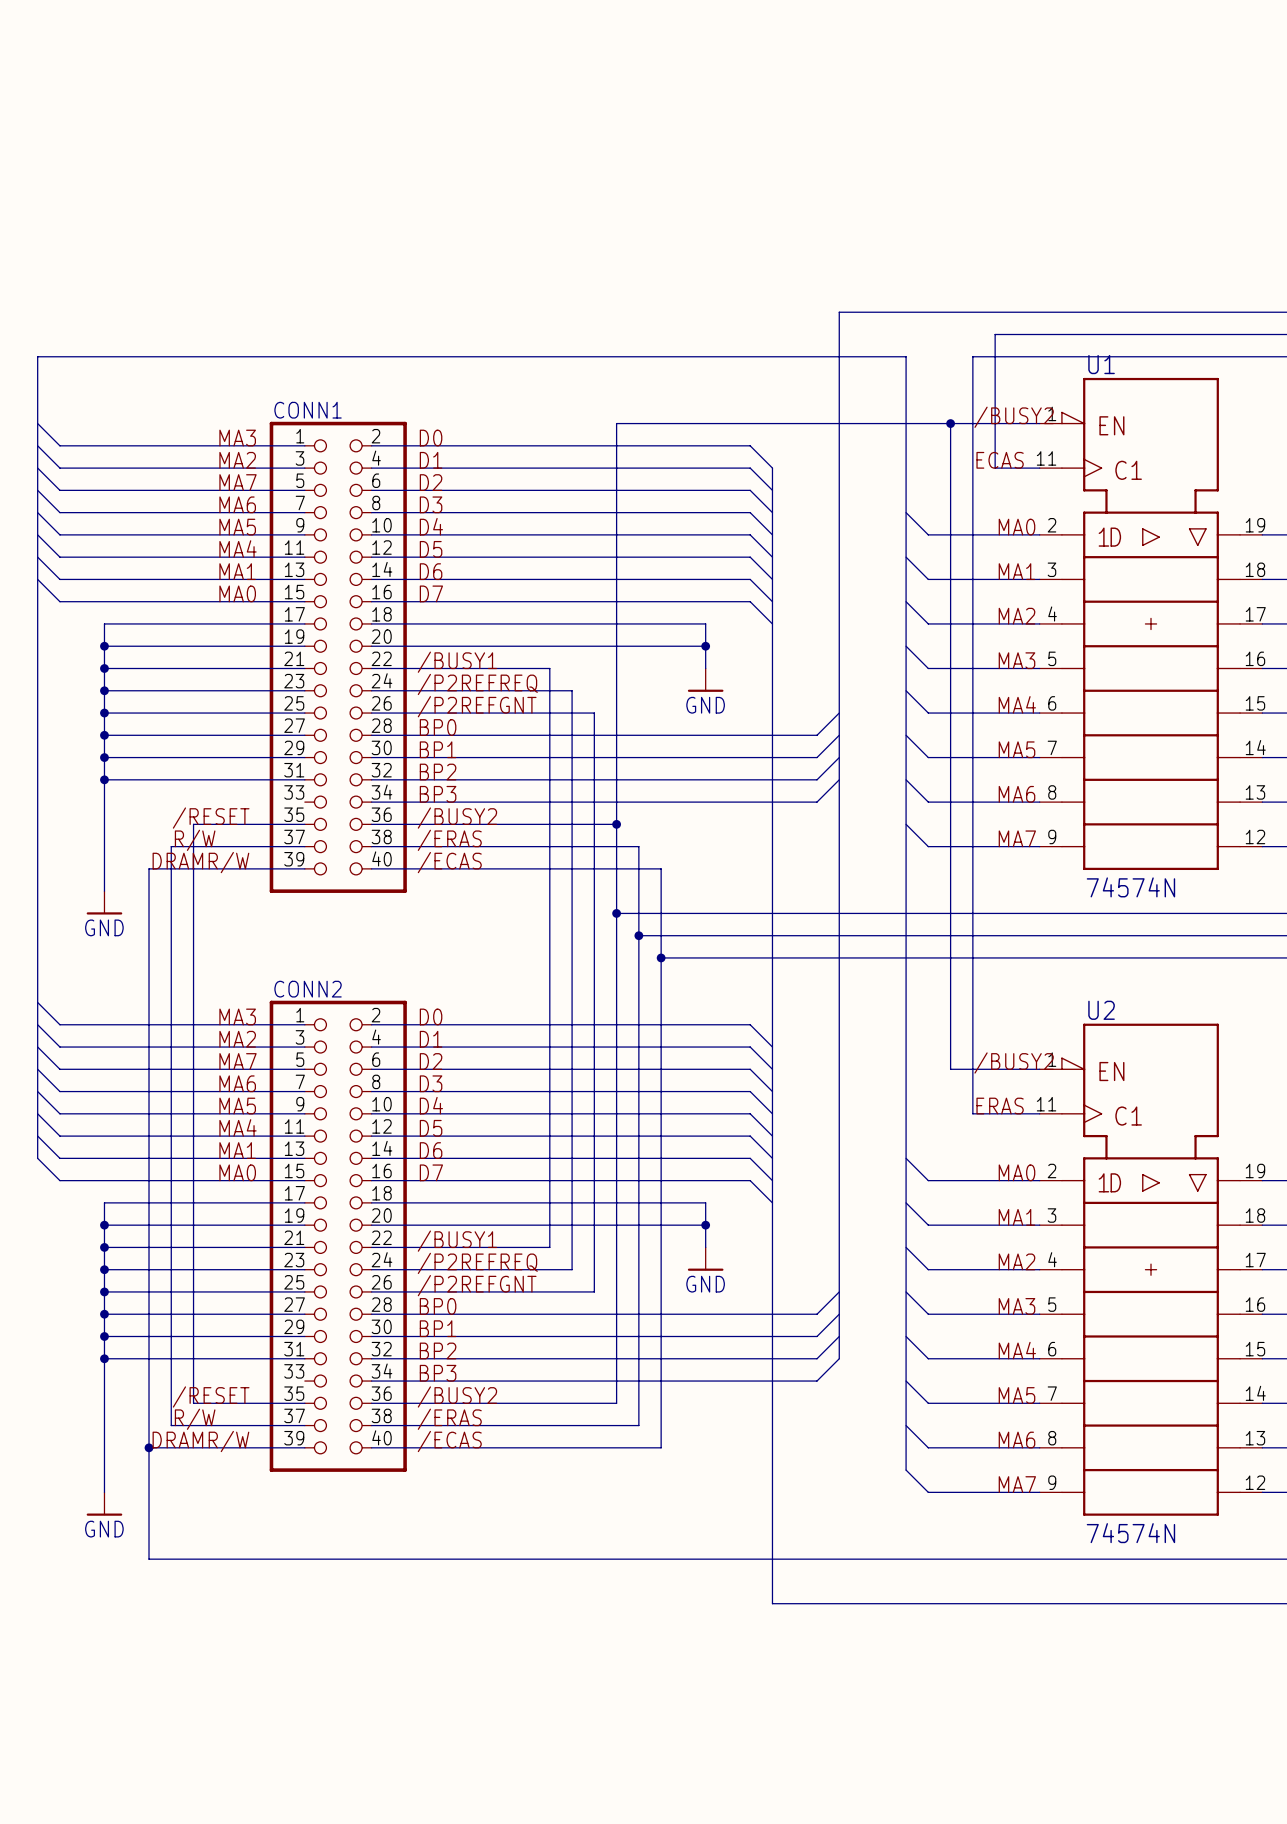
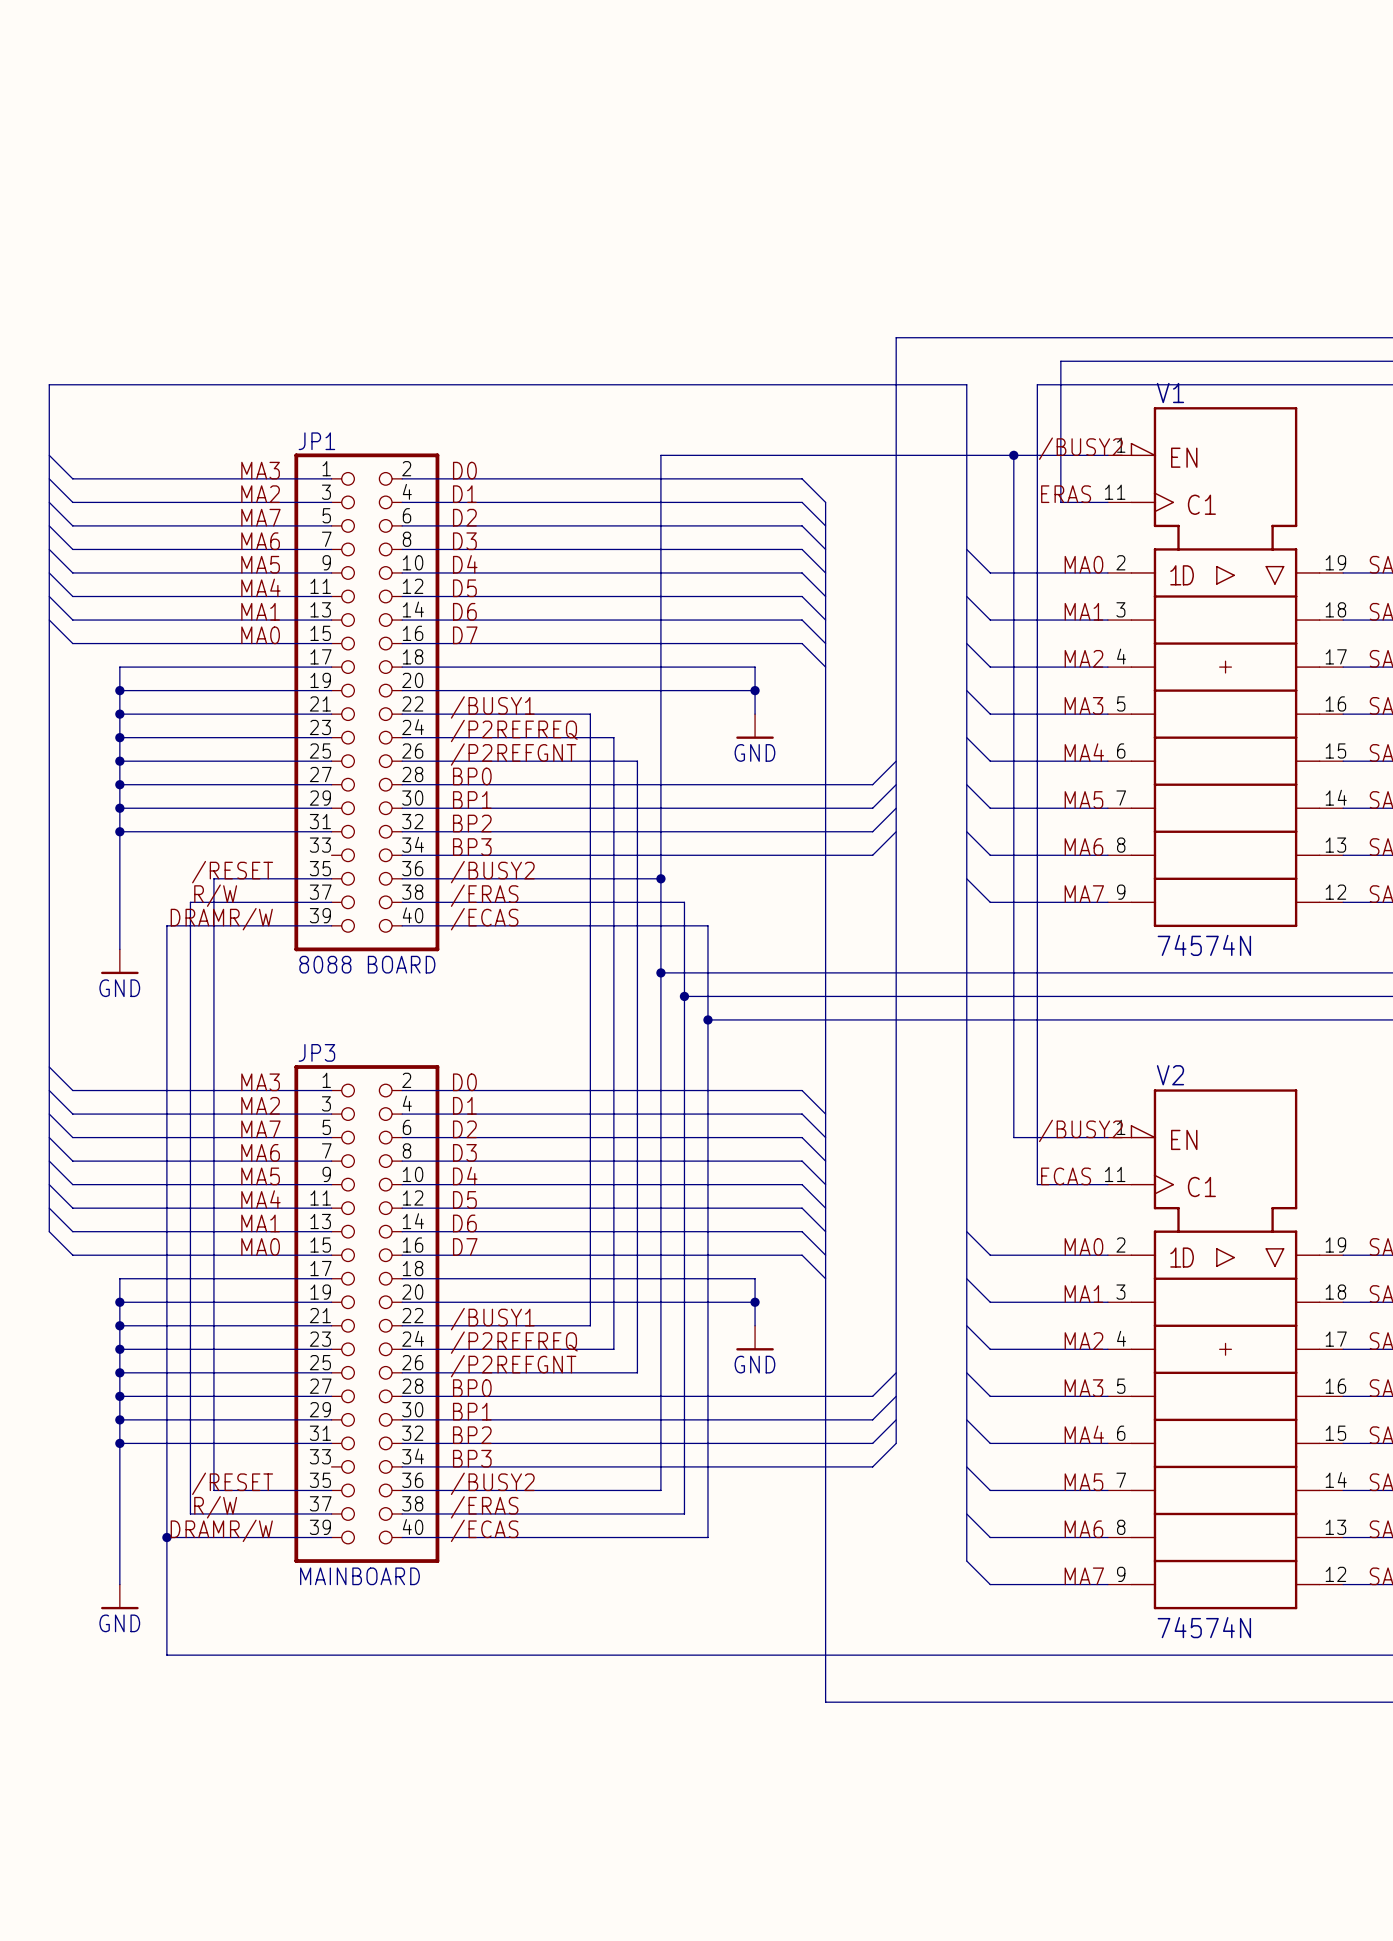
U1 name: U1 (1101, 364) -> V1 (1170, 393)
CONN1 name: CONN1 (308, 410) -> JP1 (316, 441)
label: ECAS (1000, 460) -> ERAS (1066, 494)
CONN1 value: none -> 8088 BOARD (367, 964)
CONN2 name: CONN2 (308, 989) -> JP3 (316, 1052)
U2 name: U2 (1101, 1010) -> V2 (1170, 1075)
label: ERAS (1000, 1106) -> ECAS (1066, 1176)
CONN2 value: none -> MAINBOARD (359, 1576)

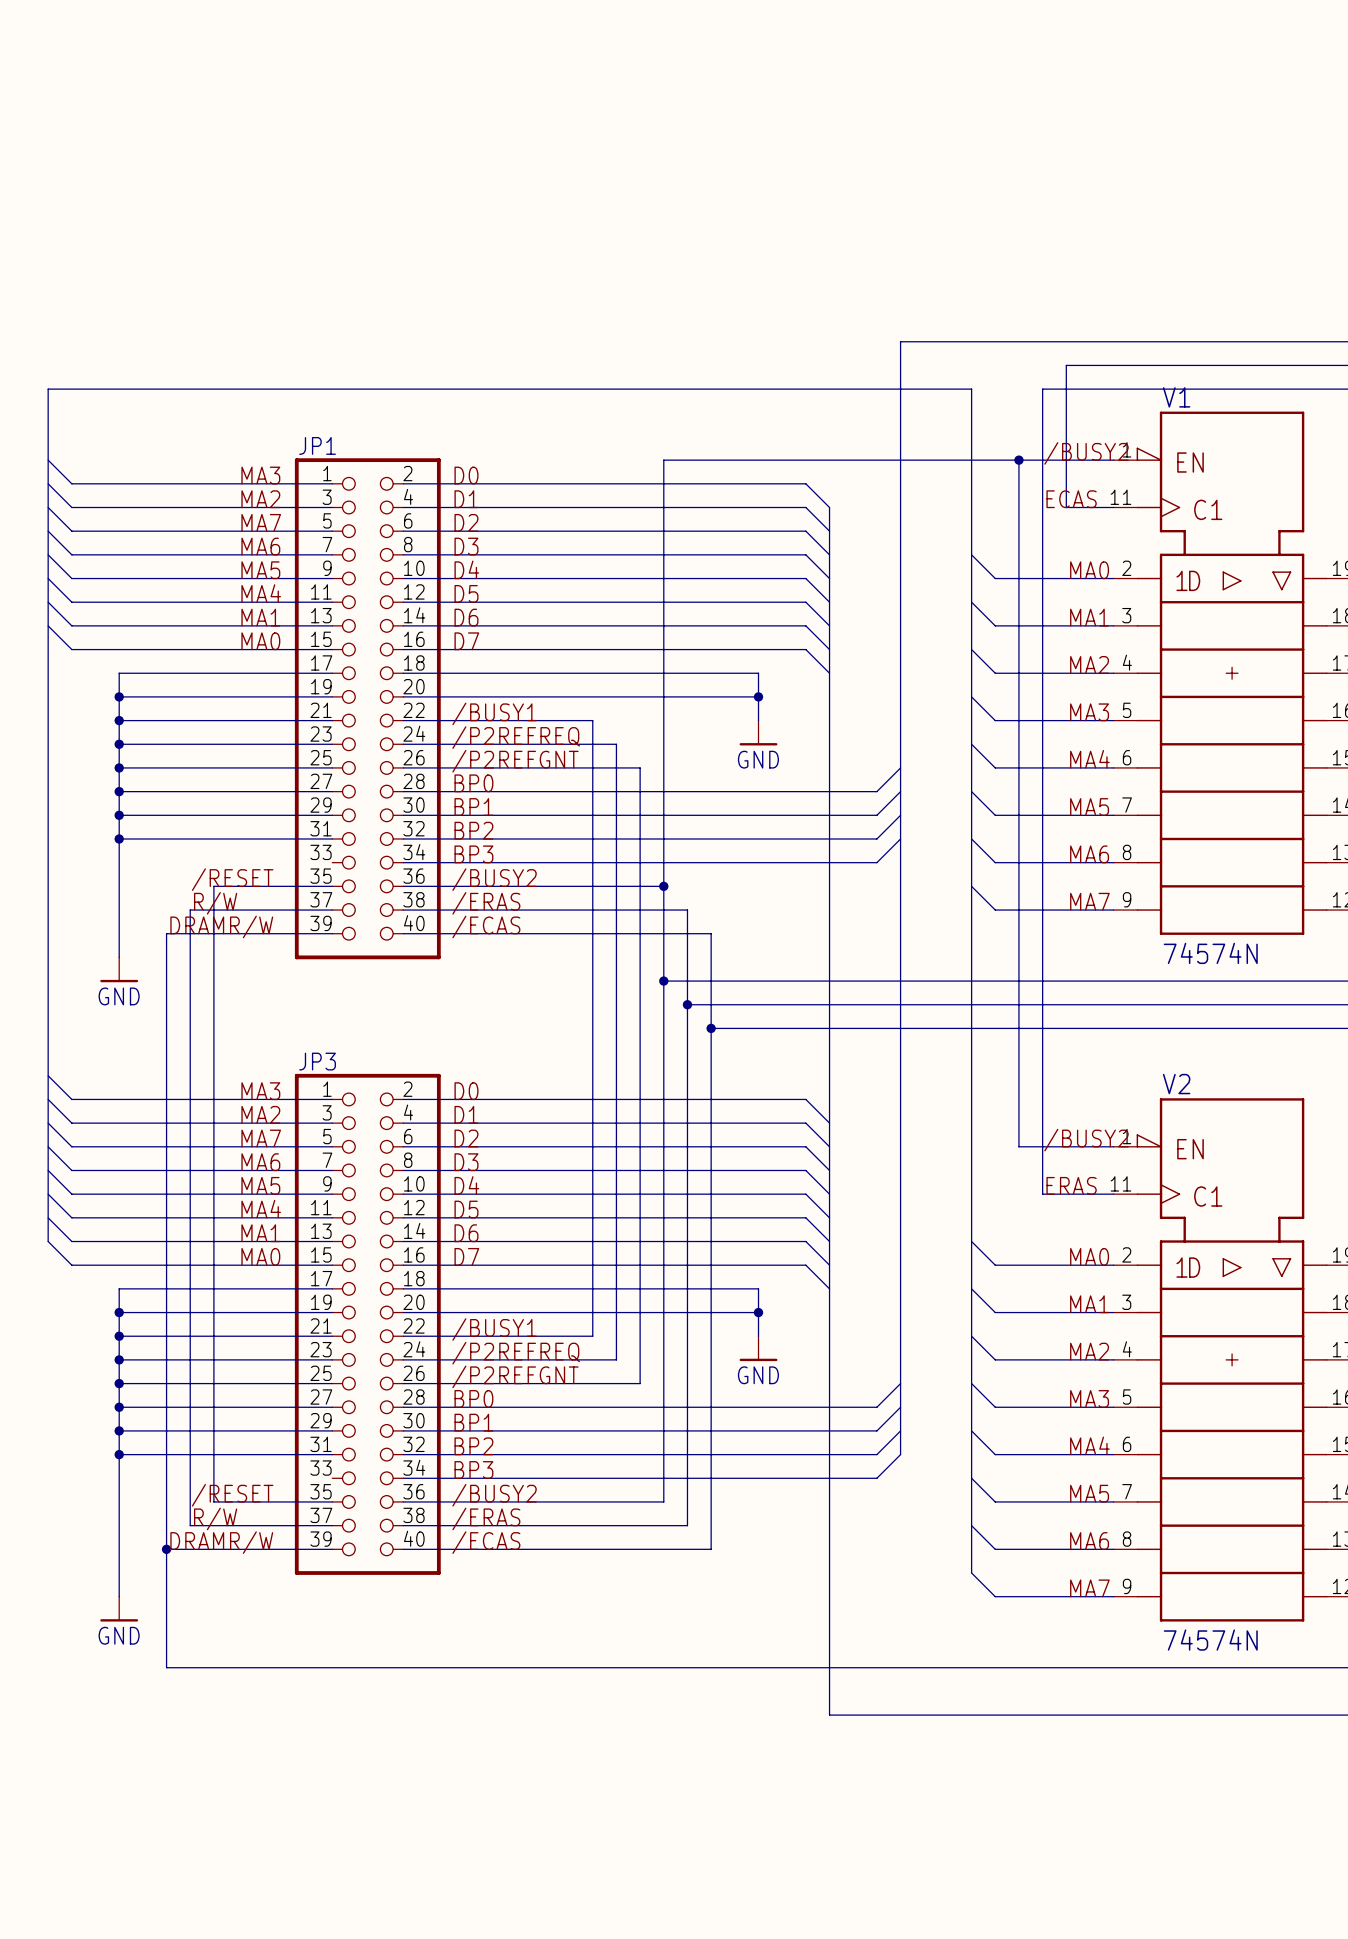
label: ERAS (1066, 494) -> ECAS (1071, 499)
JP1 value: 8088 BOARD (367, 964) -> none
label: ECAS (1066, 1176) -> ERAS (1071, 1185)
JP3 value: MAINBOARD (359, 1576) -> none

